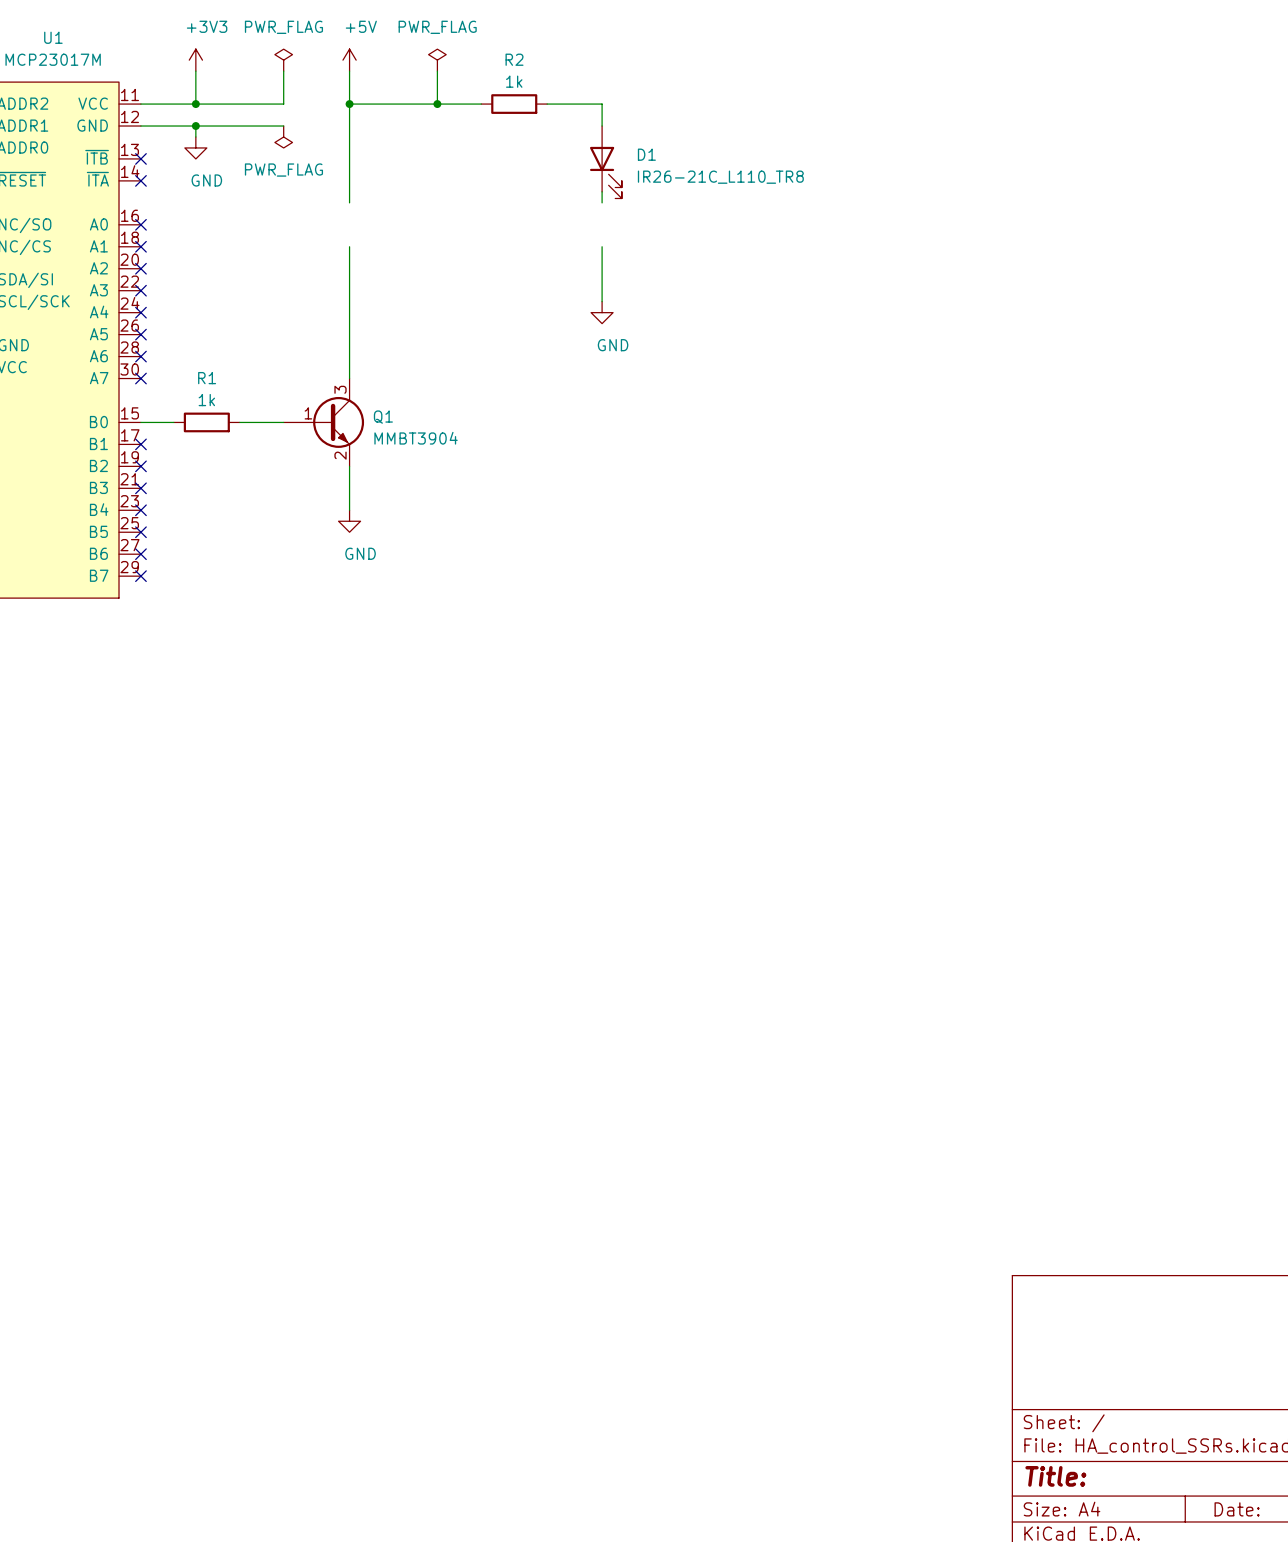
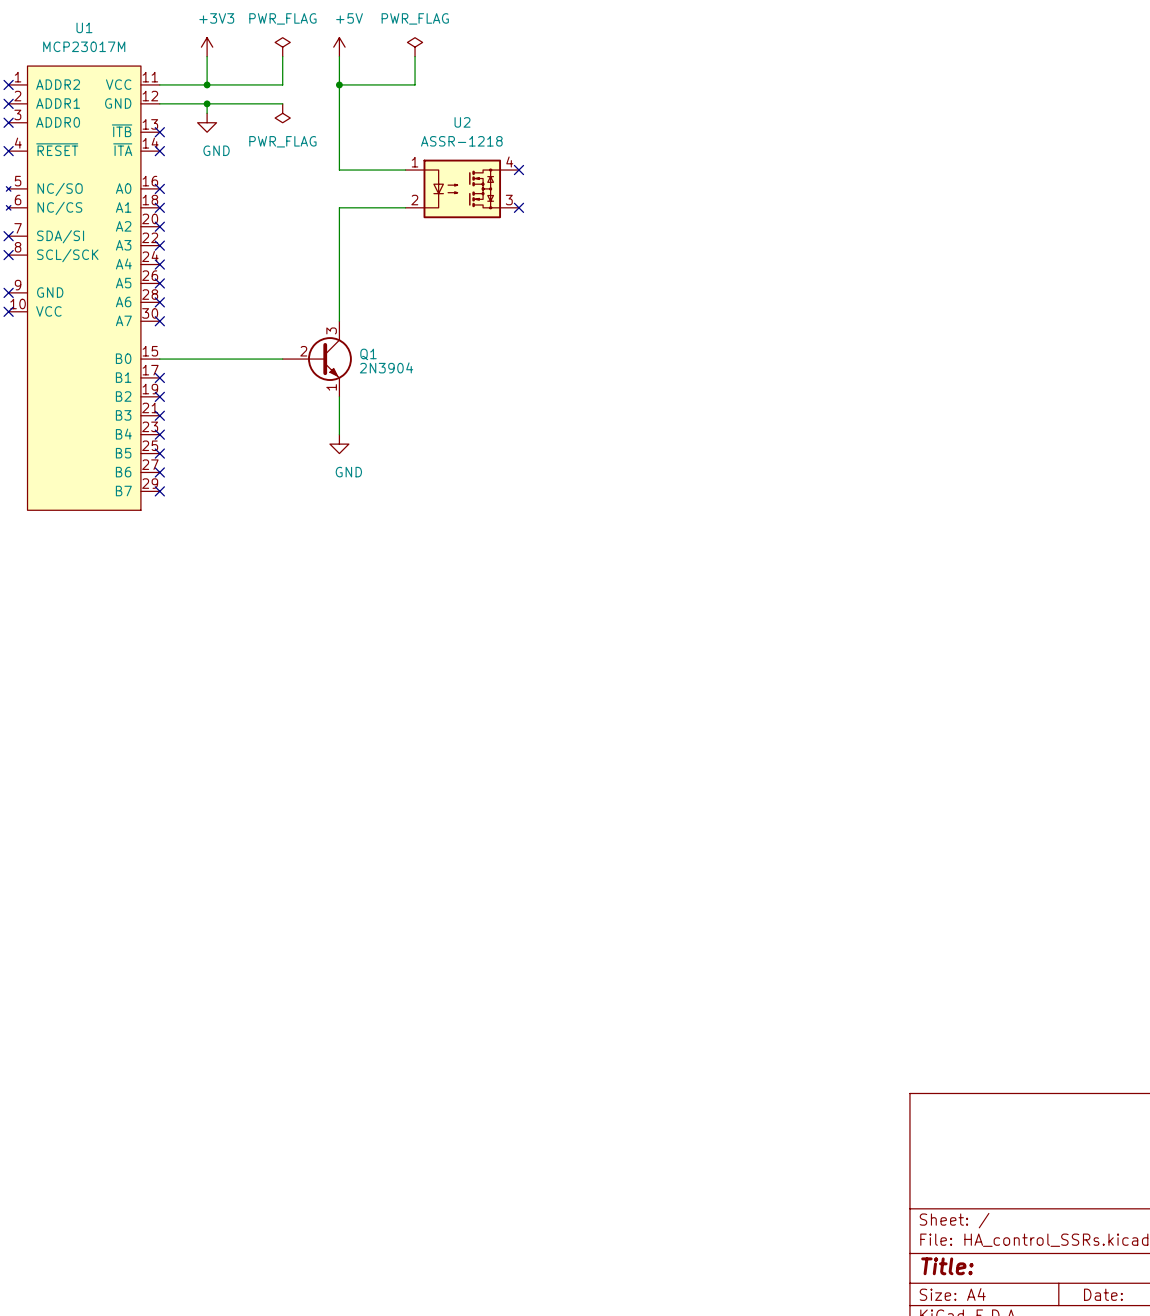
wire: (437, 104) (481, 104) -> none
junction: (437, 104) -> none
R2: 1k (514, 104) -> none
wire: (547, 104) (602, 104) (602, 126) -> none
D1: IR26-21C_L110_TR8 (605, 162) -> none
wire: (602, 191) (602, 202) -> none
wire: none -> (339, 170) (405, 170)
no-connect mark: none -> (518, 170)
U2: none -> ASSR-1218 (462, 188)
wire: none -> (339, 207) (405, 207)
no-connect mark: none -> (518, 207)
wire: (602, 246) (602, 301) -> none
power symbol: GND (602, 312) -> none
Q1 pin number: 1 (308, 413) -> 2 (303, 351)
wire: none -> (188, 359) (244, 359)
R1: 1k (206, 422) -> none
Q1 value: MMBT3904 (416, 438) -> 2N3904 (386, 367)
Q1 pin number: 2 (340, 455) -> 1 (331, 387)

